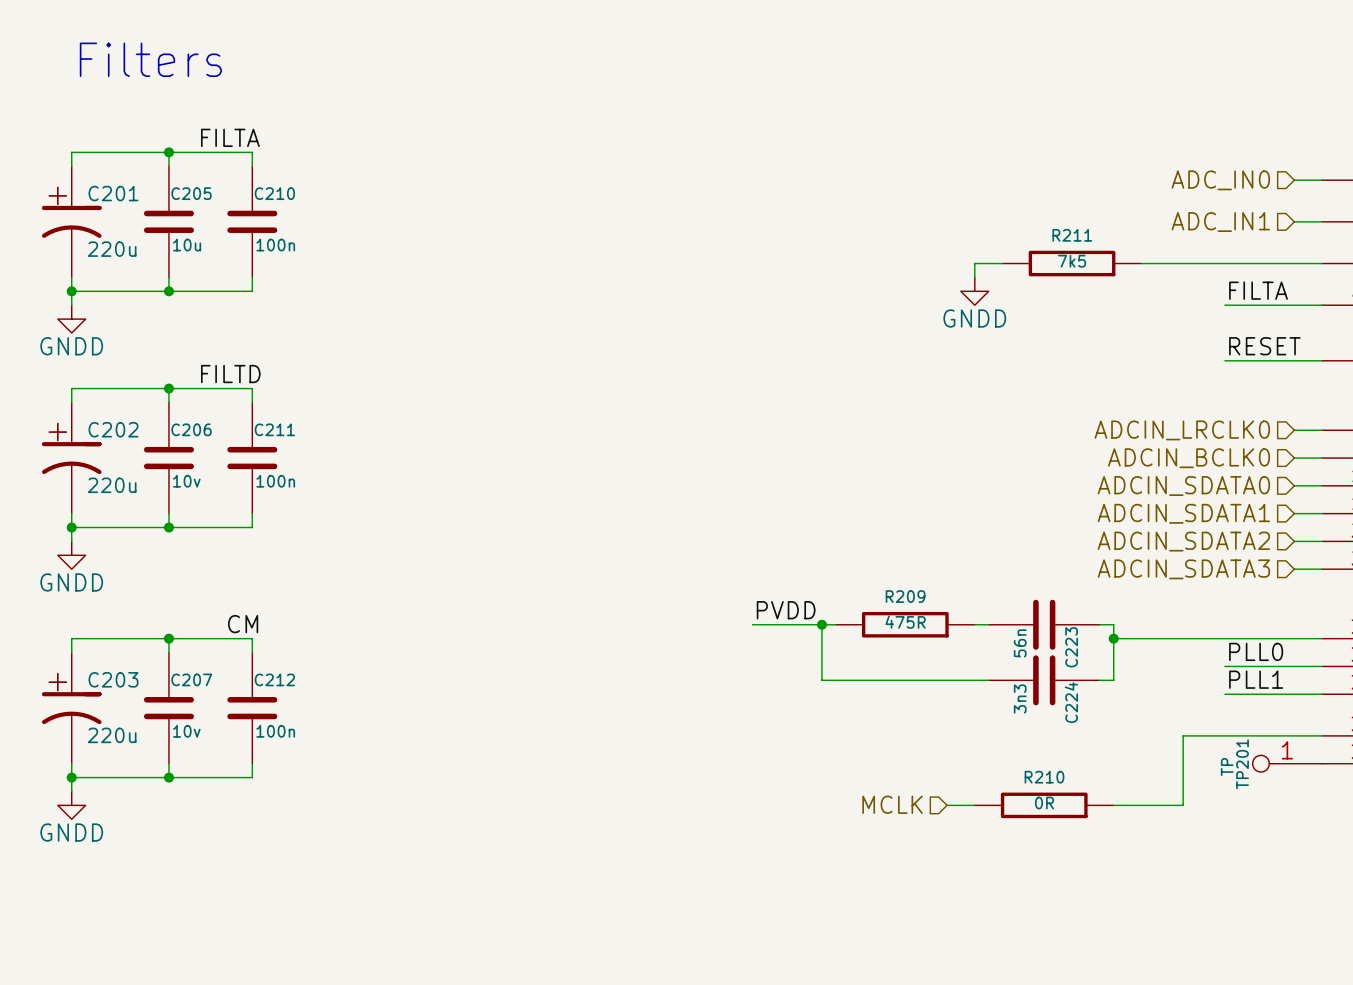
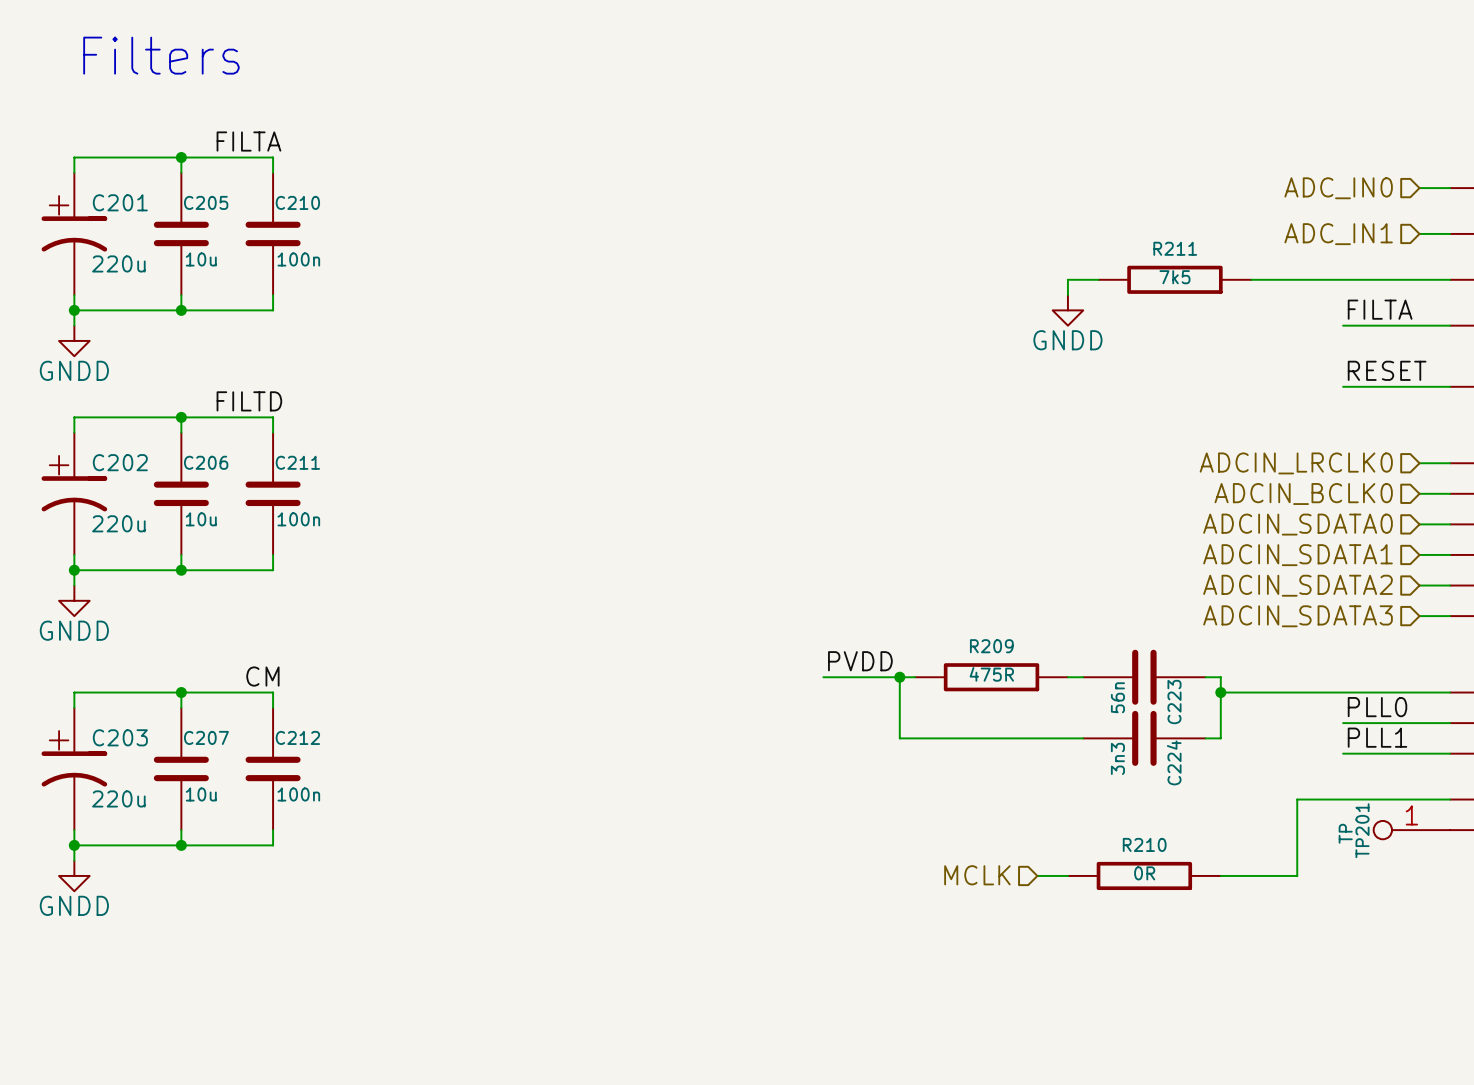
C206 value: 10v (186, 481) -> 10u (201, 519)
C207 value: 10v (186, 731) -> 10u (201, 794)

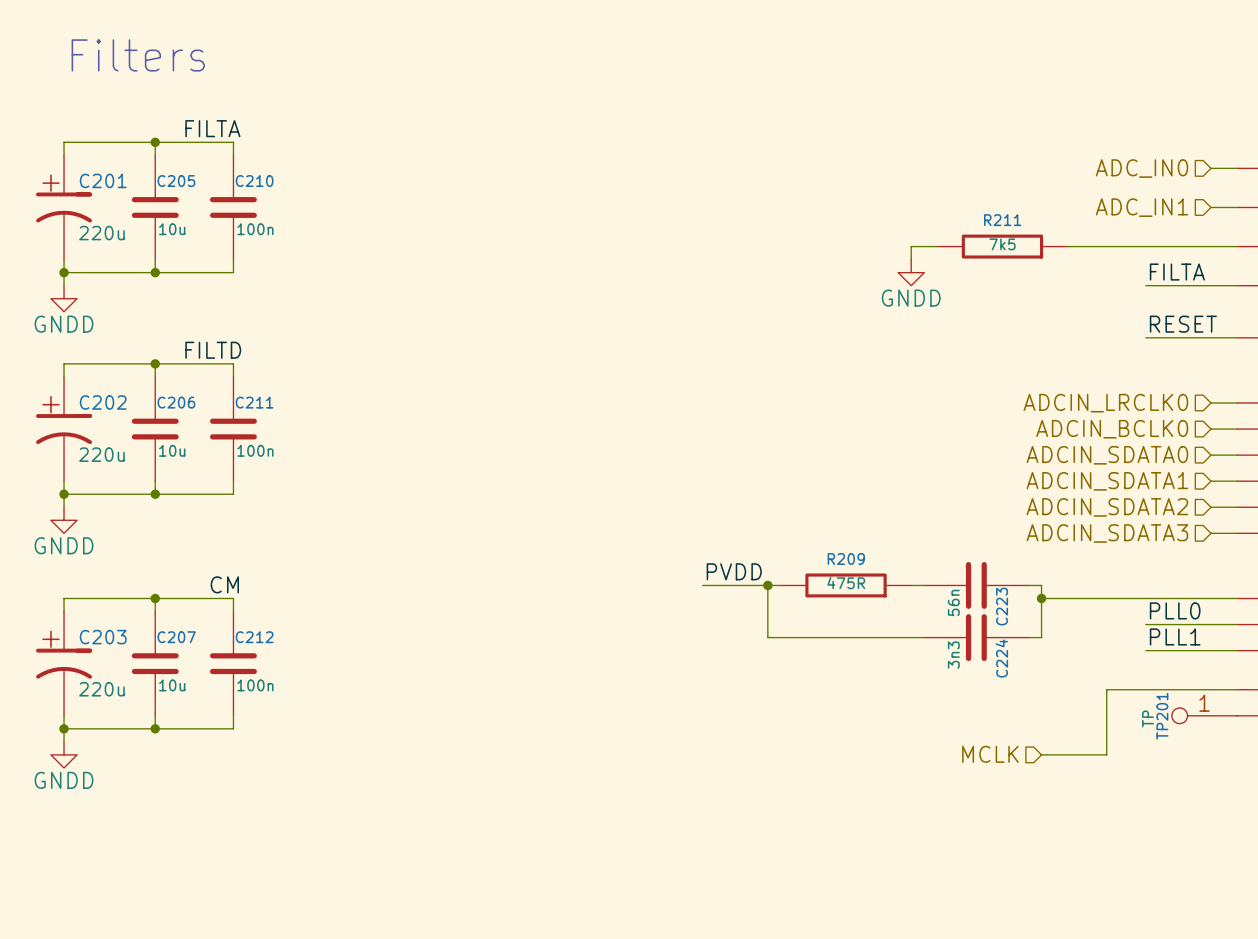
hierarchical label position: MCLK (977, 875) -> MCLK (990, 754)
wire: (1037, 875) (1067, 875) -> none
R210: 0R (1144, 875) -> none

